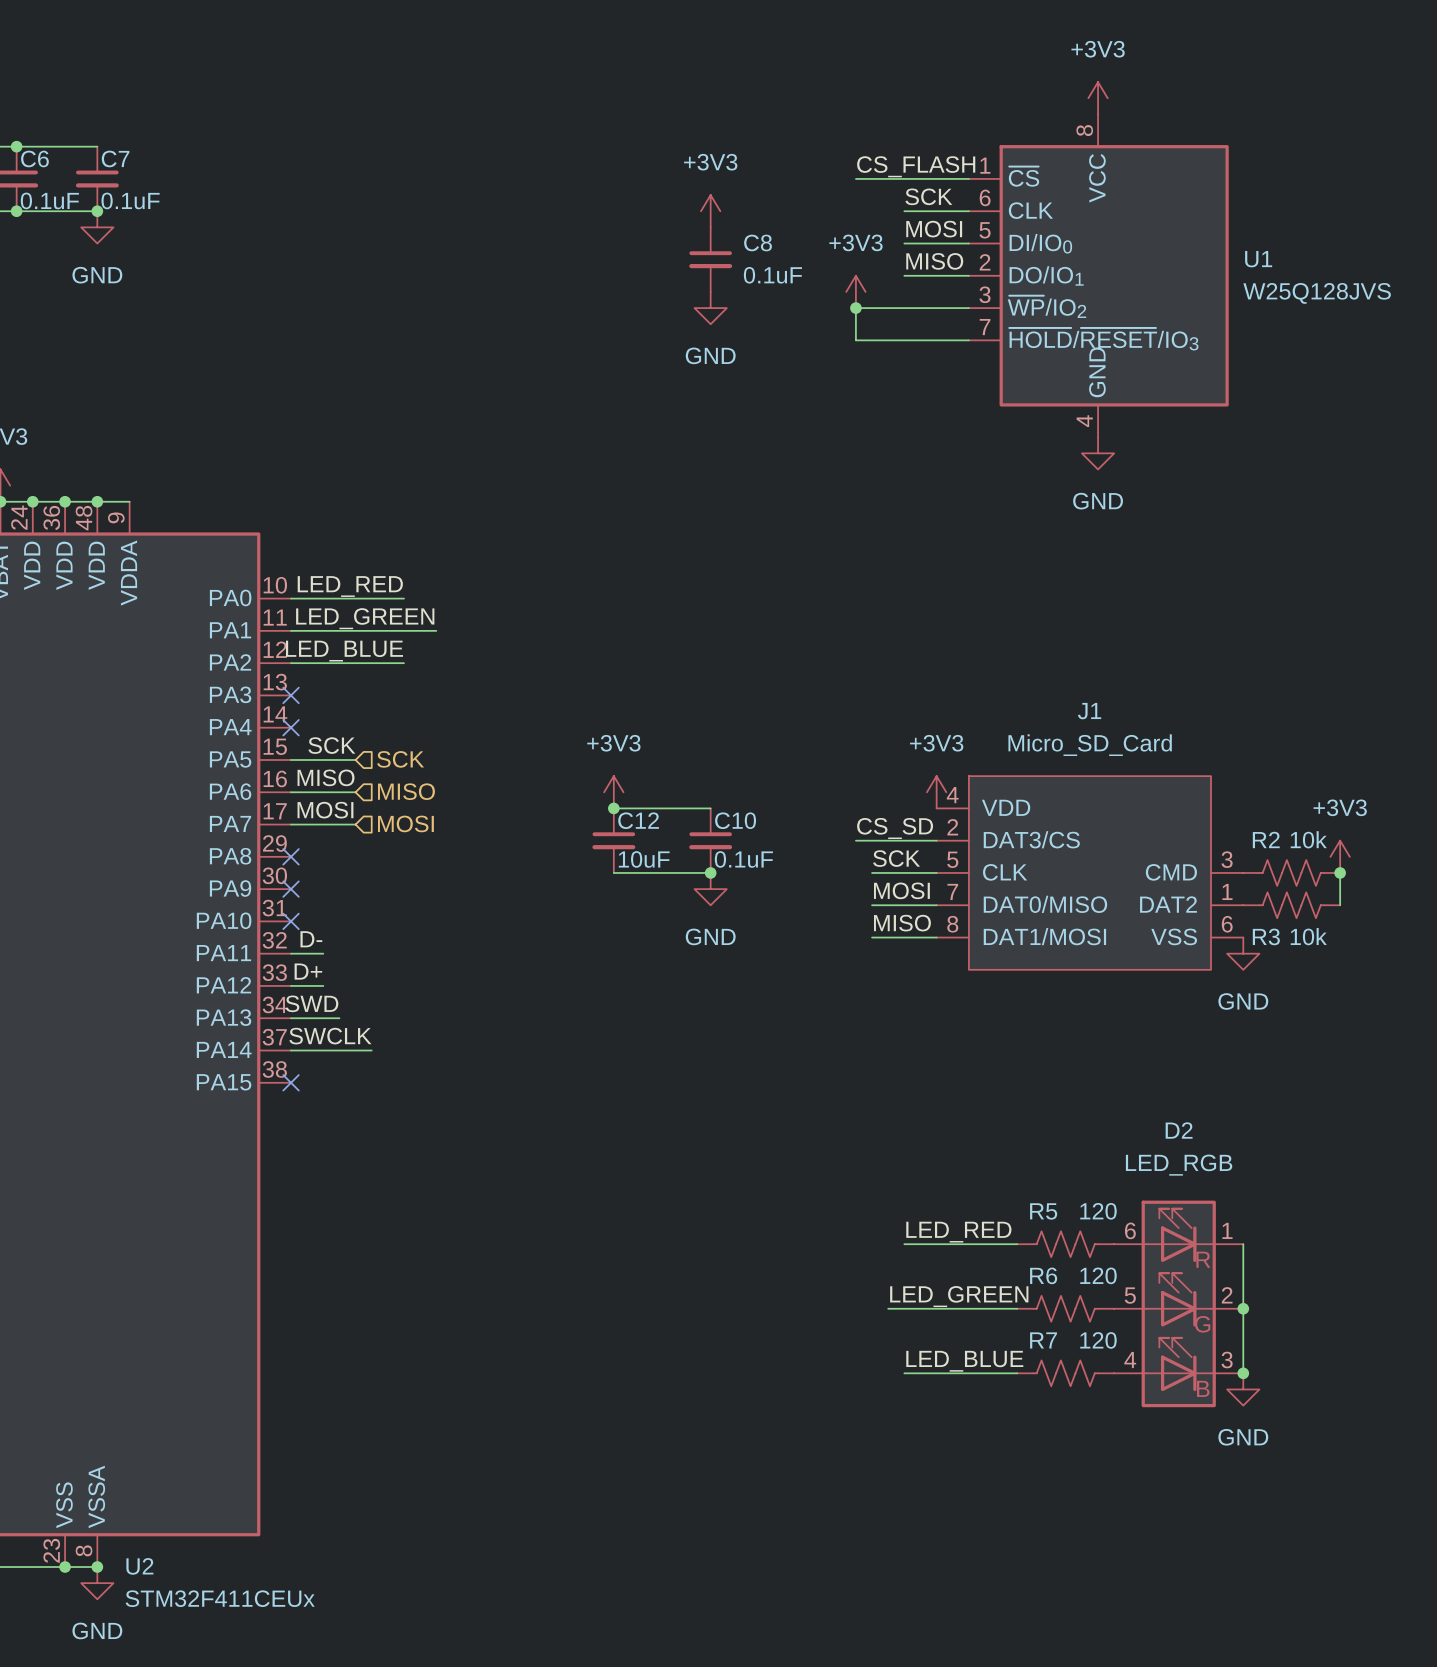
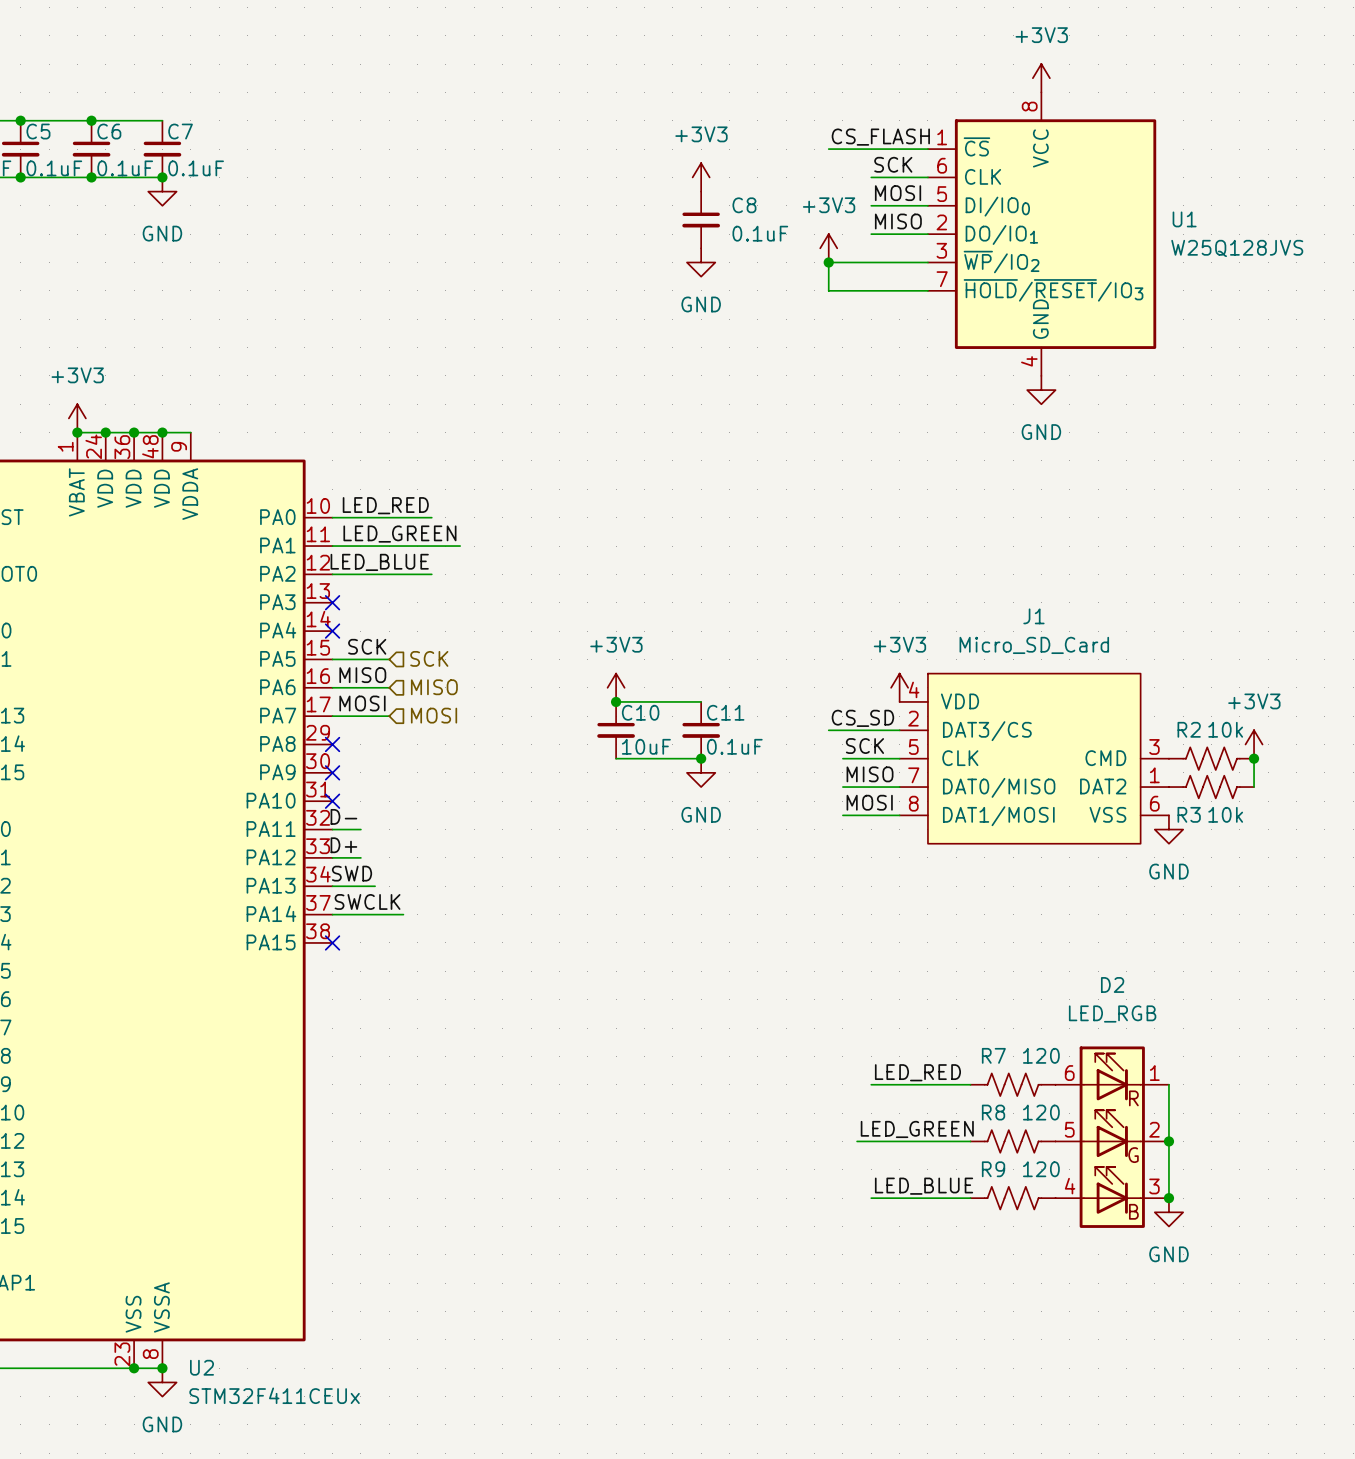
C12 name: C12 (638, 820) -> C10 (640, 712)
C10 name: C10 (735, 820) -> C11 (725, 712)
label: MOSI (901, 890) -> MISO (870, 774)
label: MISO (902, 923) -> MOSI (869, 802)
R5 name: R5 (1043, 1211) -> R7 (993, 1055)
R6 name: R6 (1043, 1275) -> R8 (993, 1112)
R7 name: R7 (1043, 1340) -> R9 (993, 1169)

